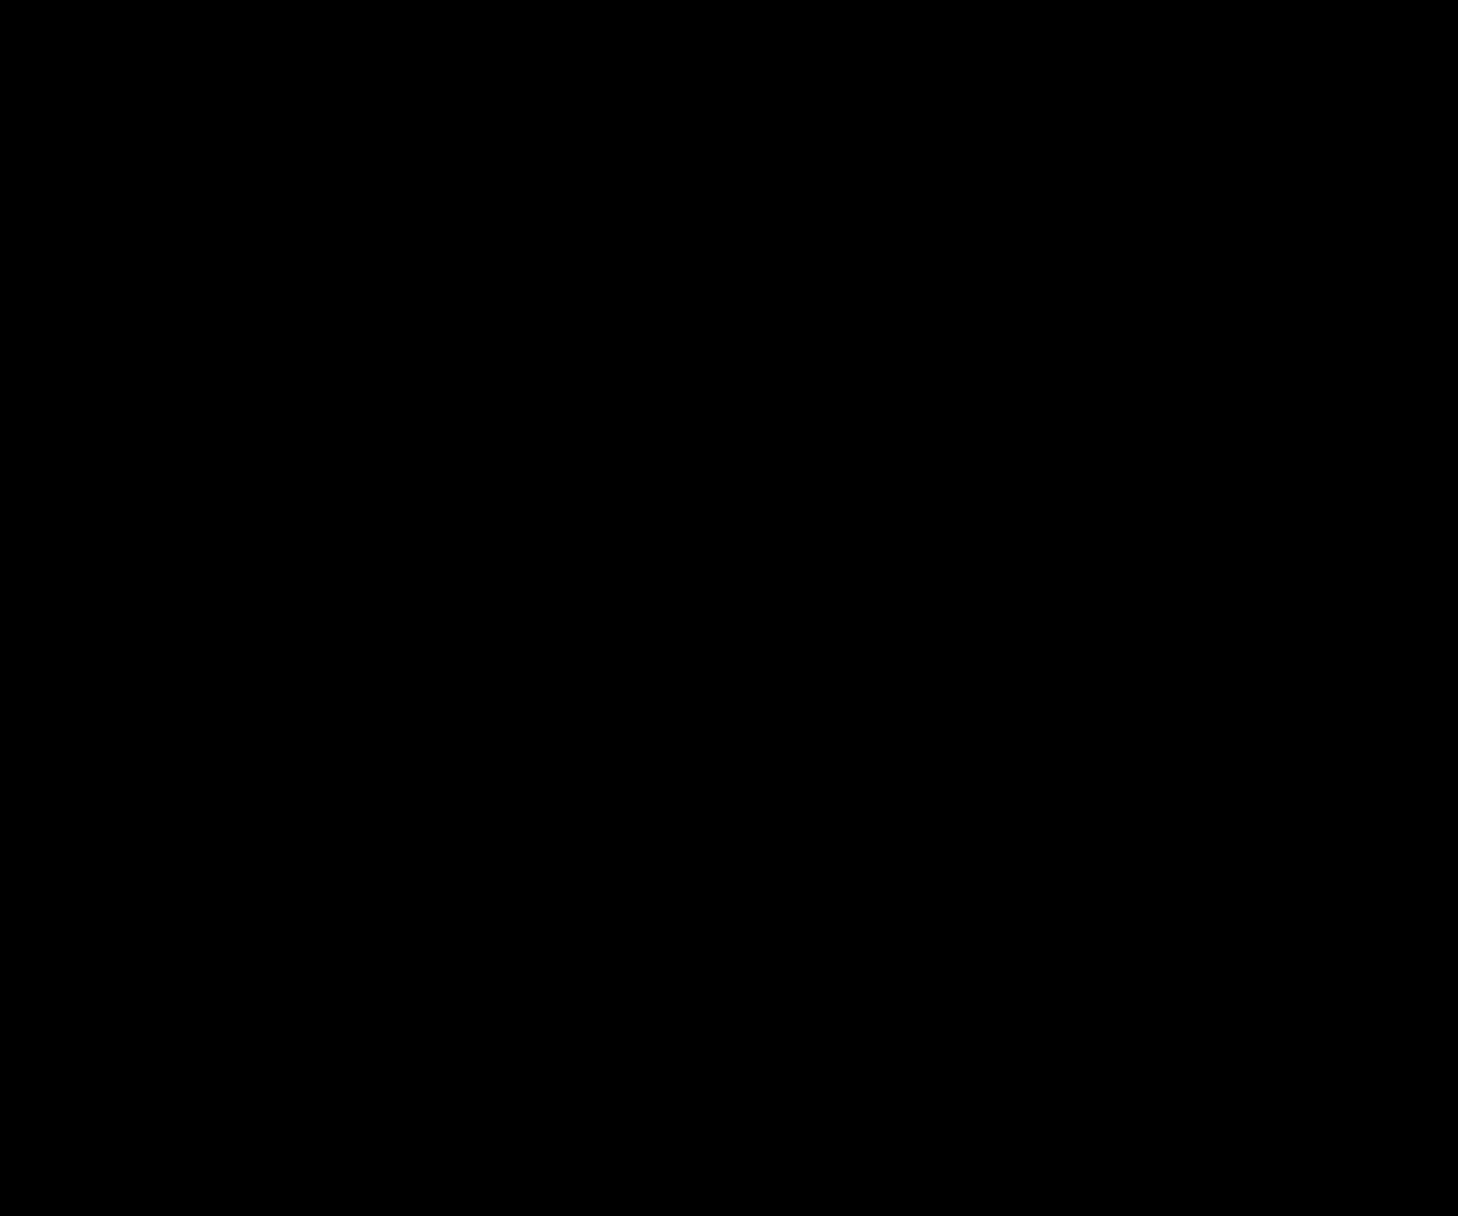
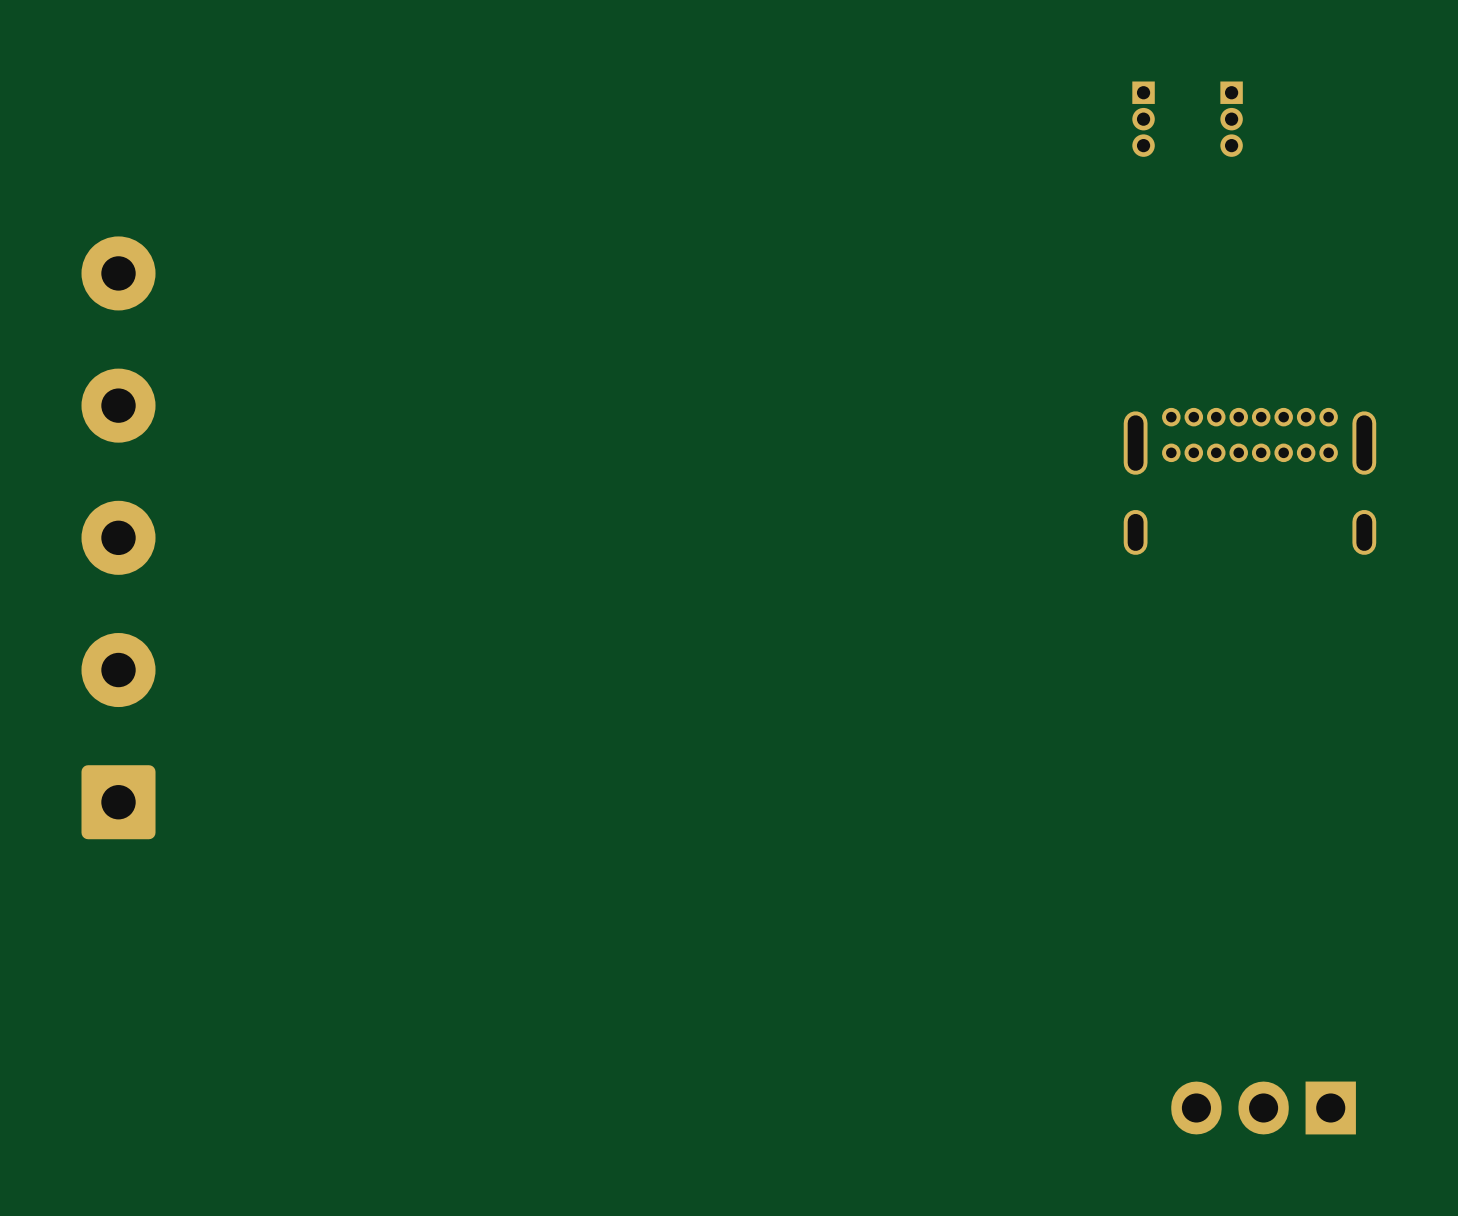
part: none -> (1143, 119)
part: none -> (1231, 119)
part: none -> (1249, 481)
part: none -> (118, 537)
part: none -> (1263, 1107)

